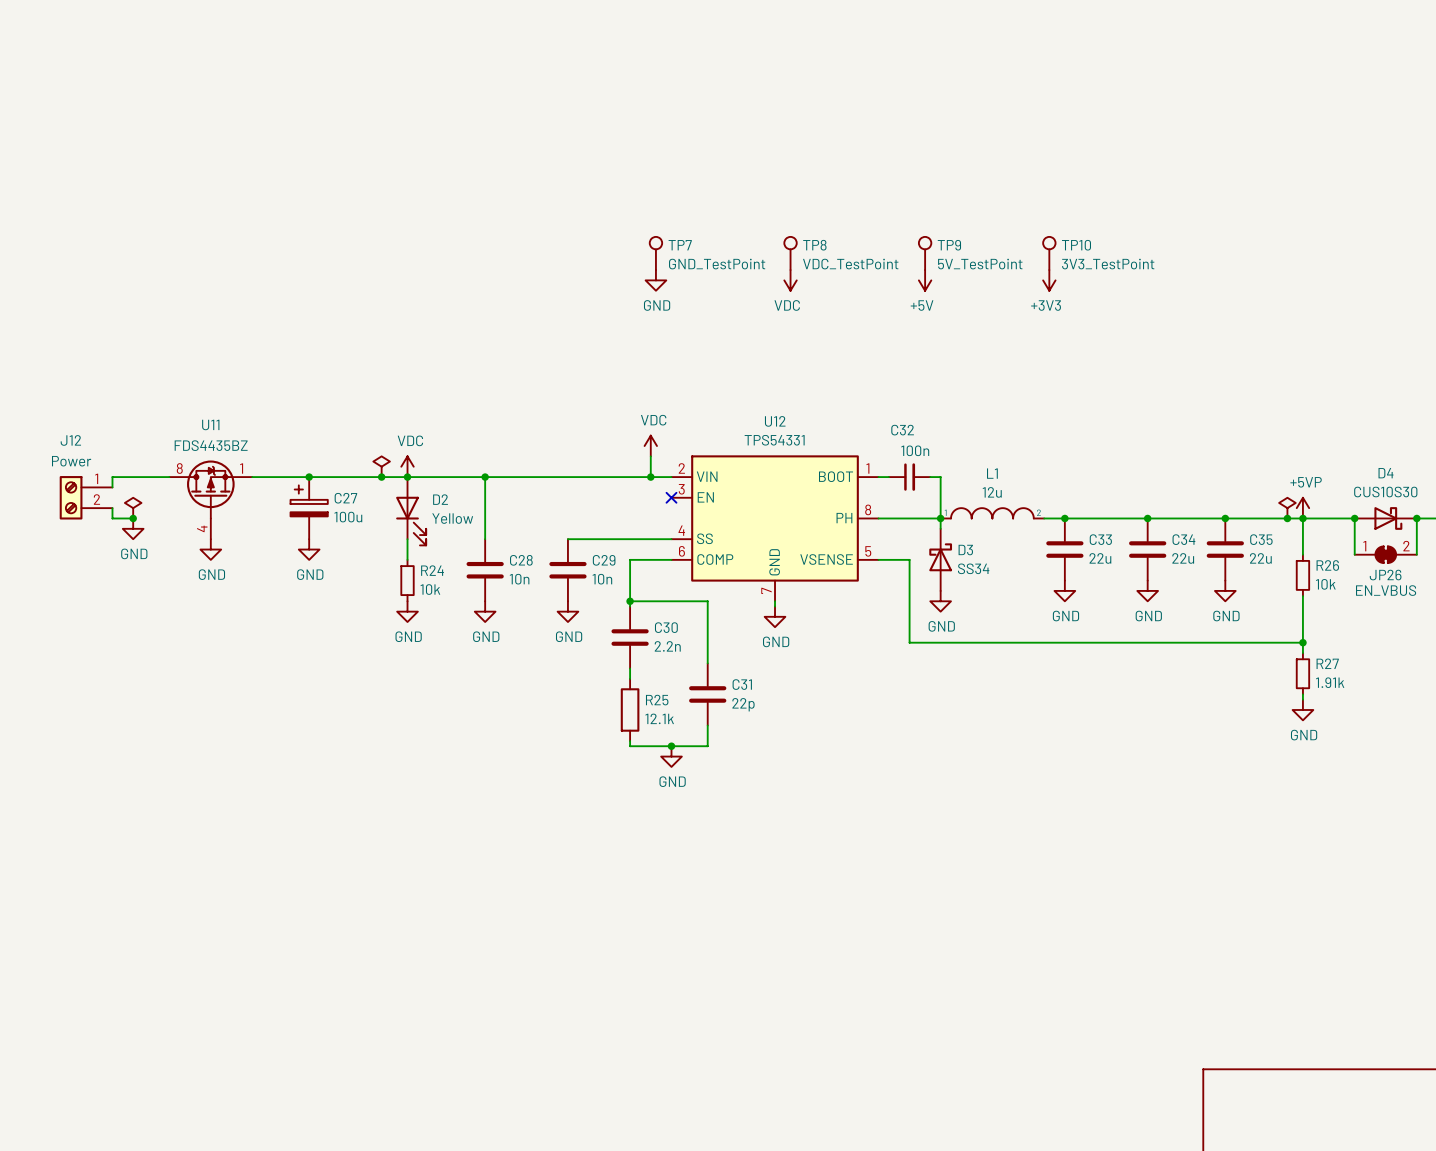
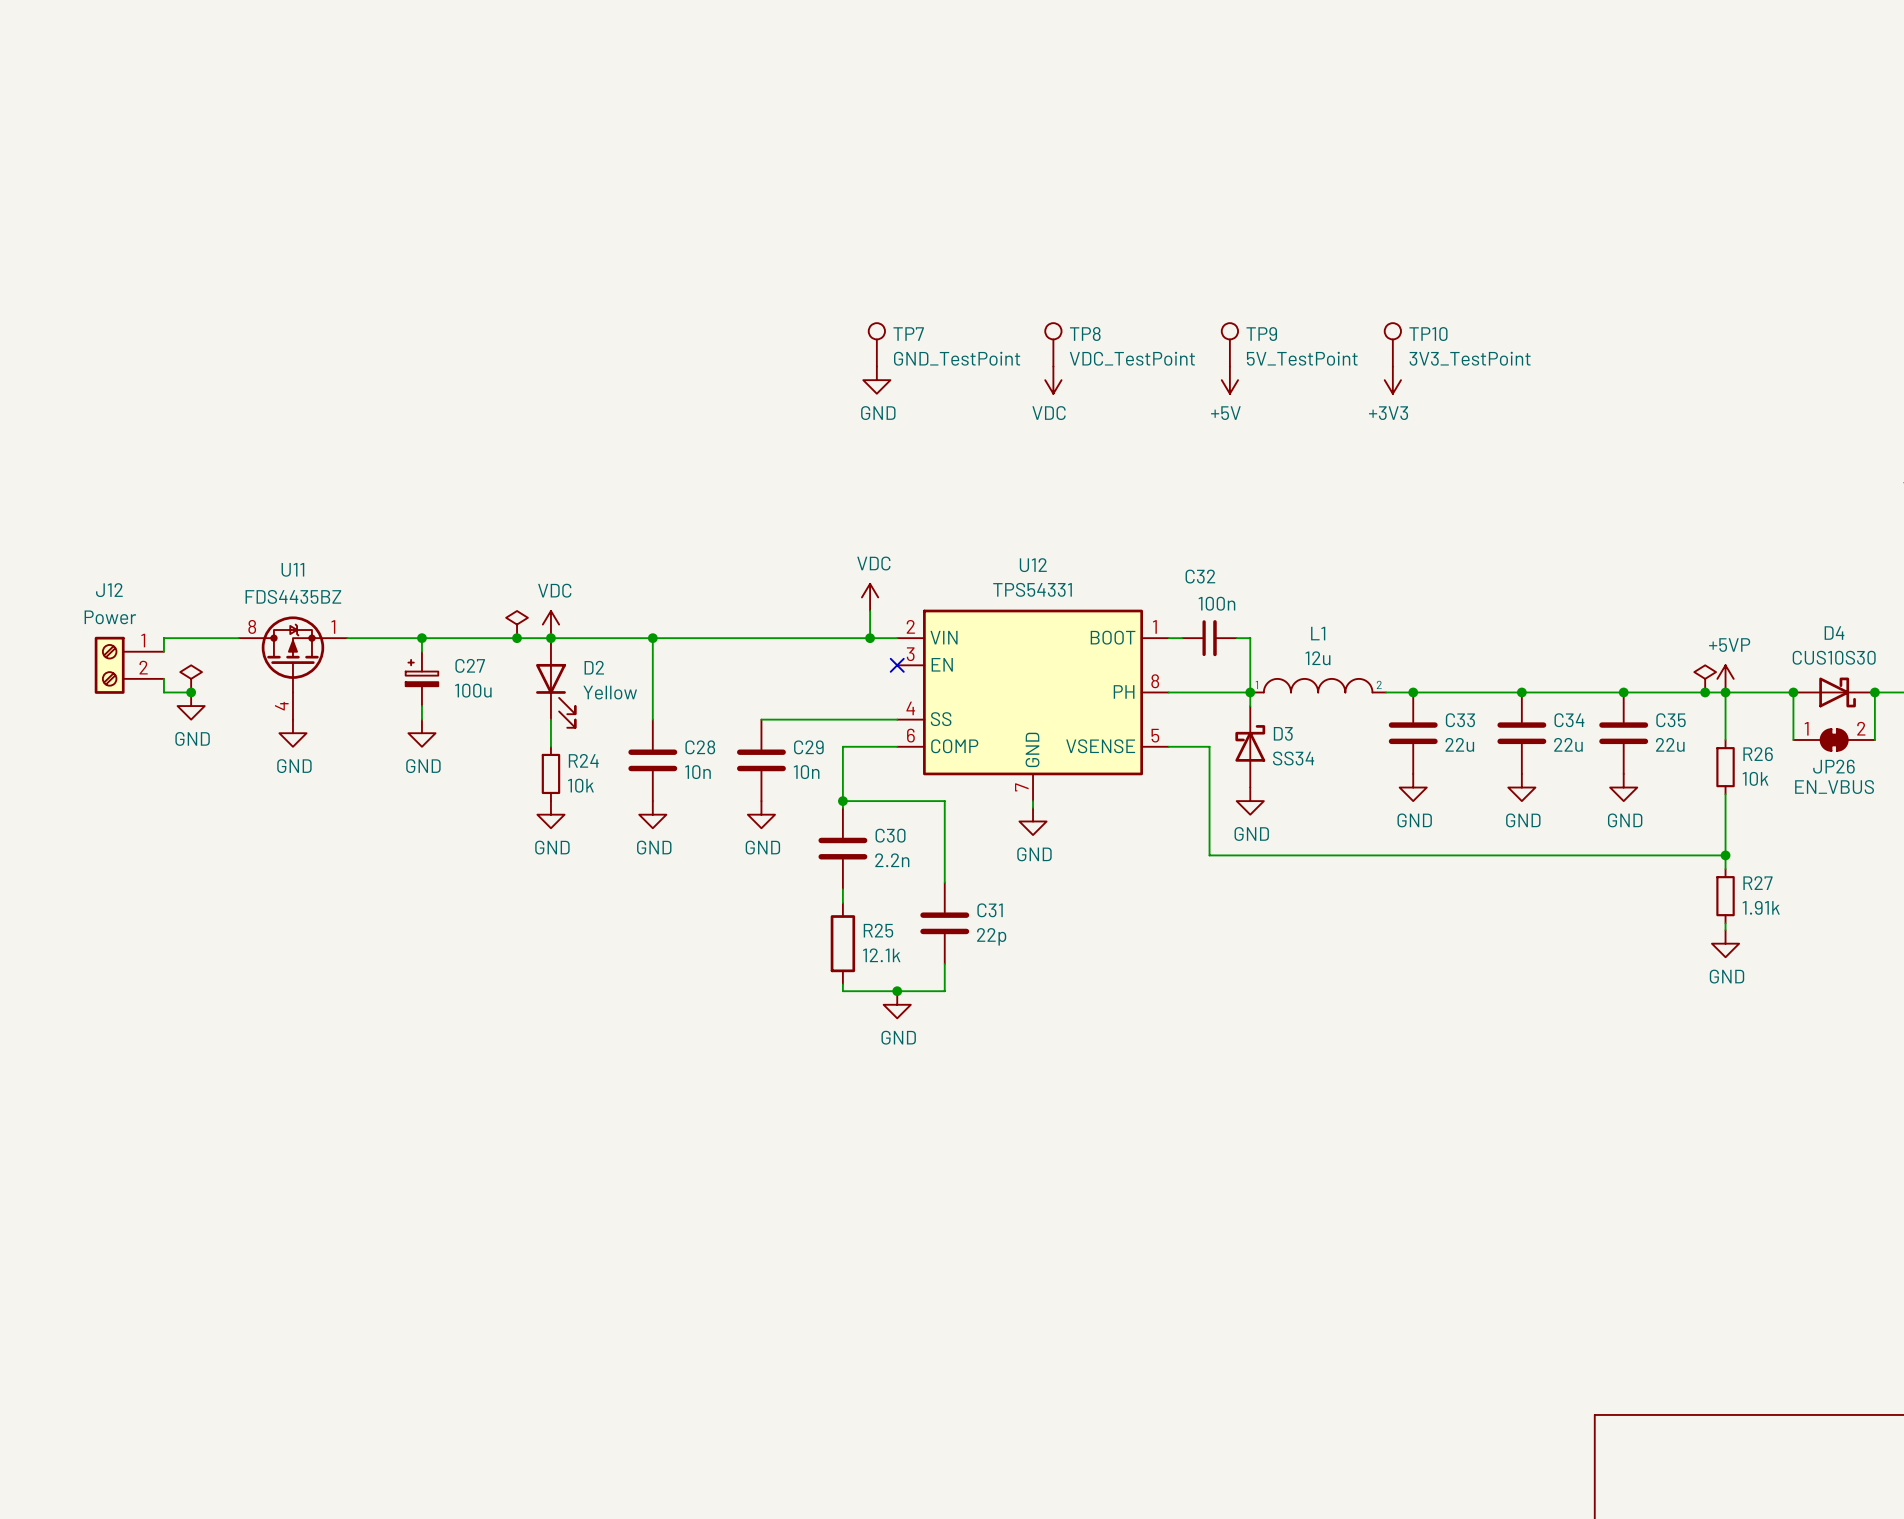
C27 symbol: [290, 477, 328, 540] -> [405, 651, 439, 707]

